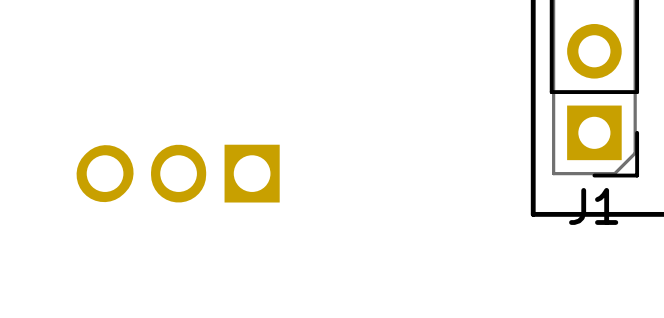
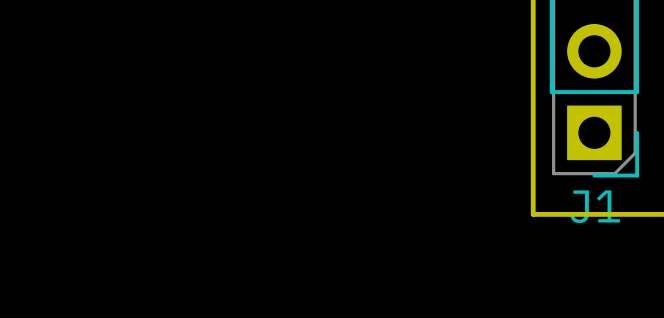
part: (178, 173) -> none

